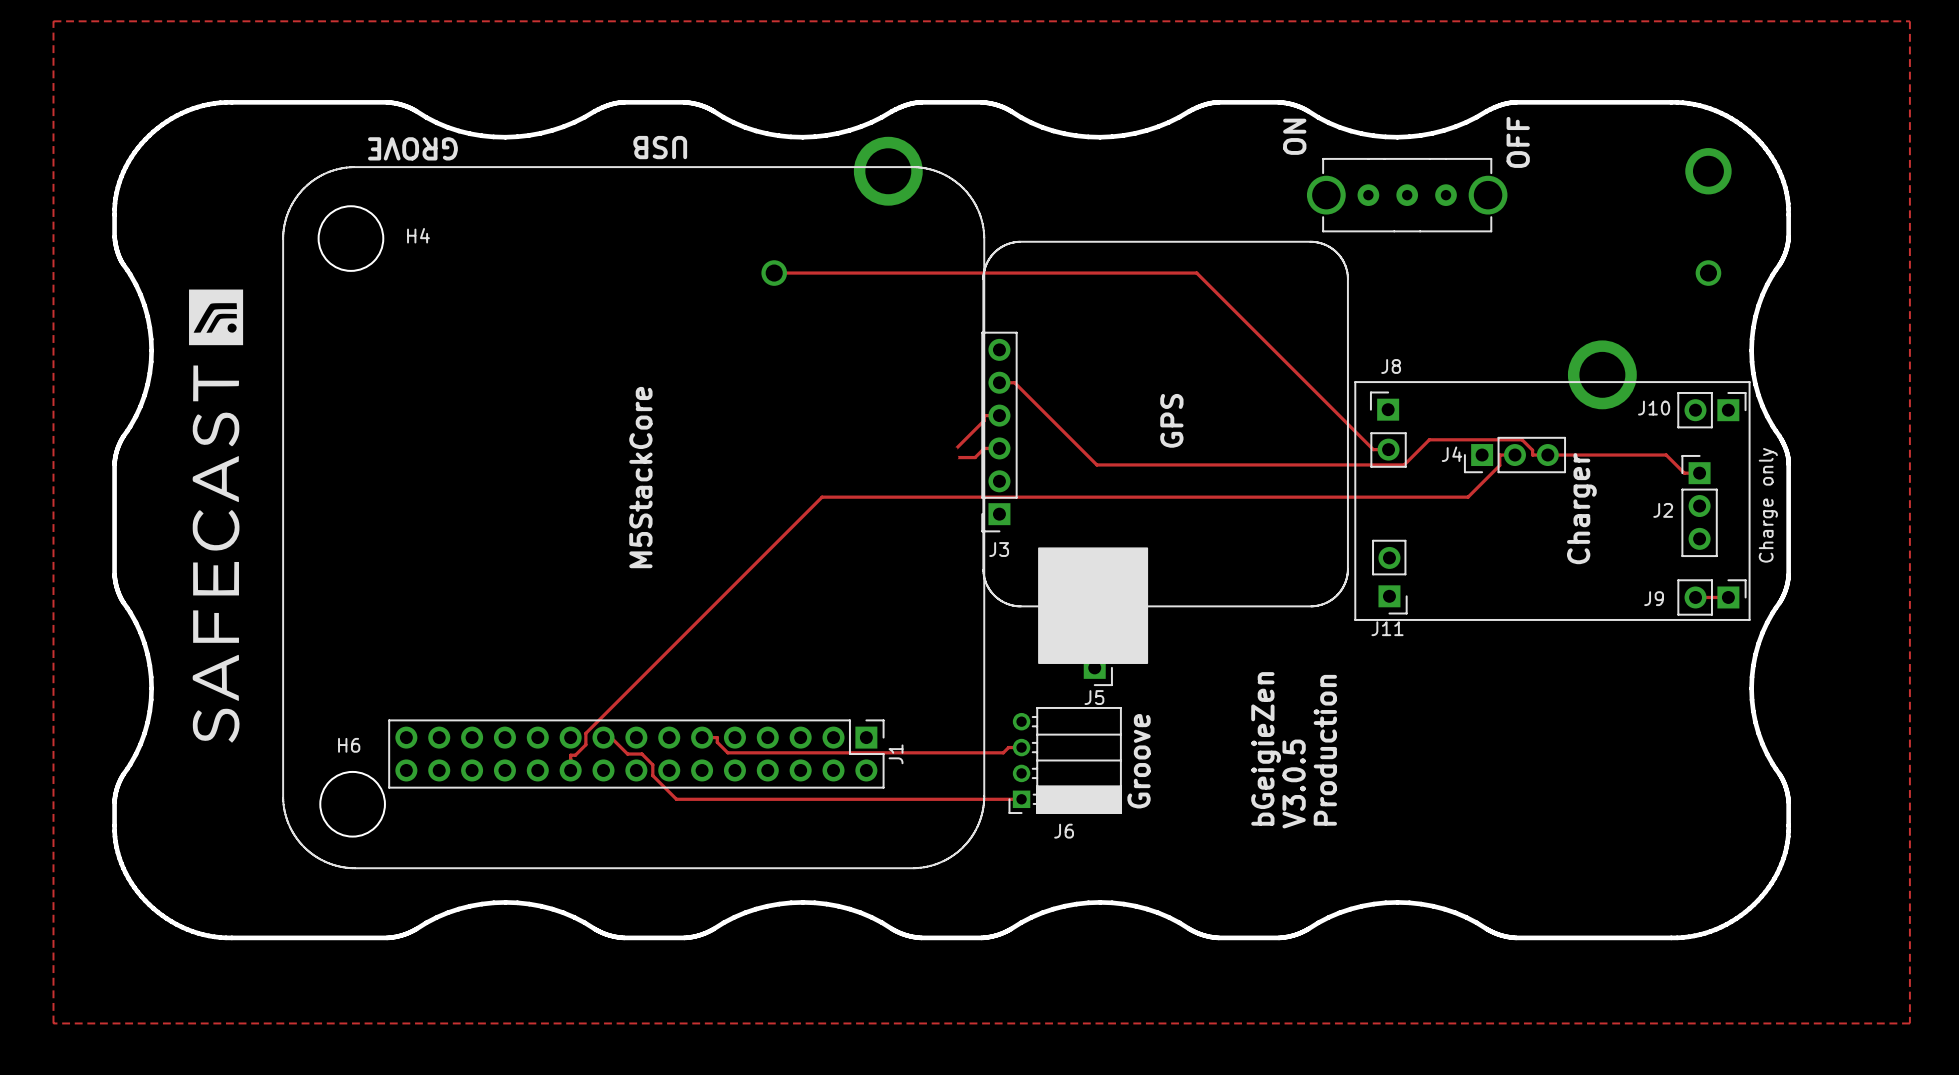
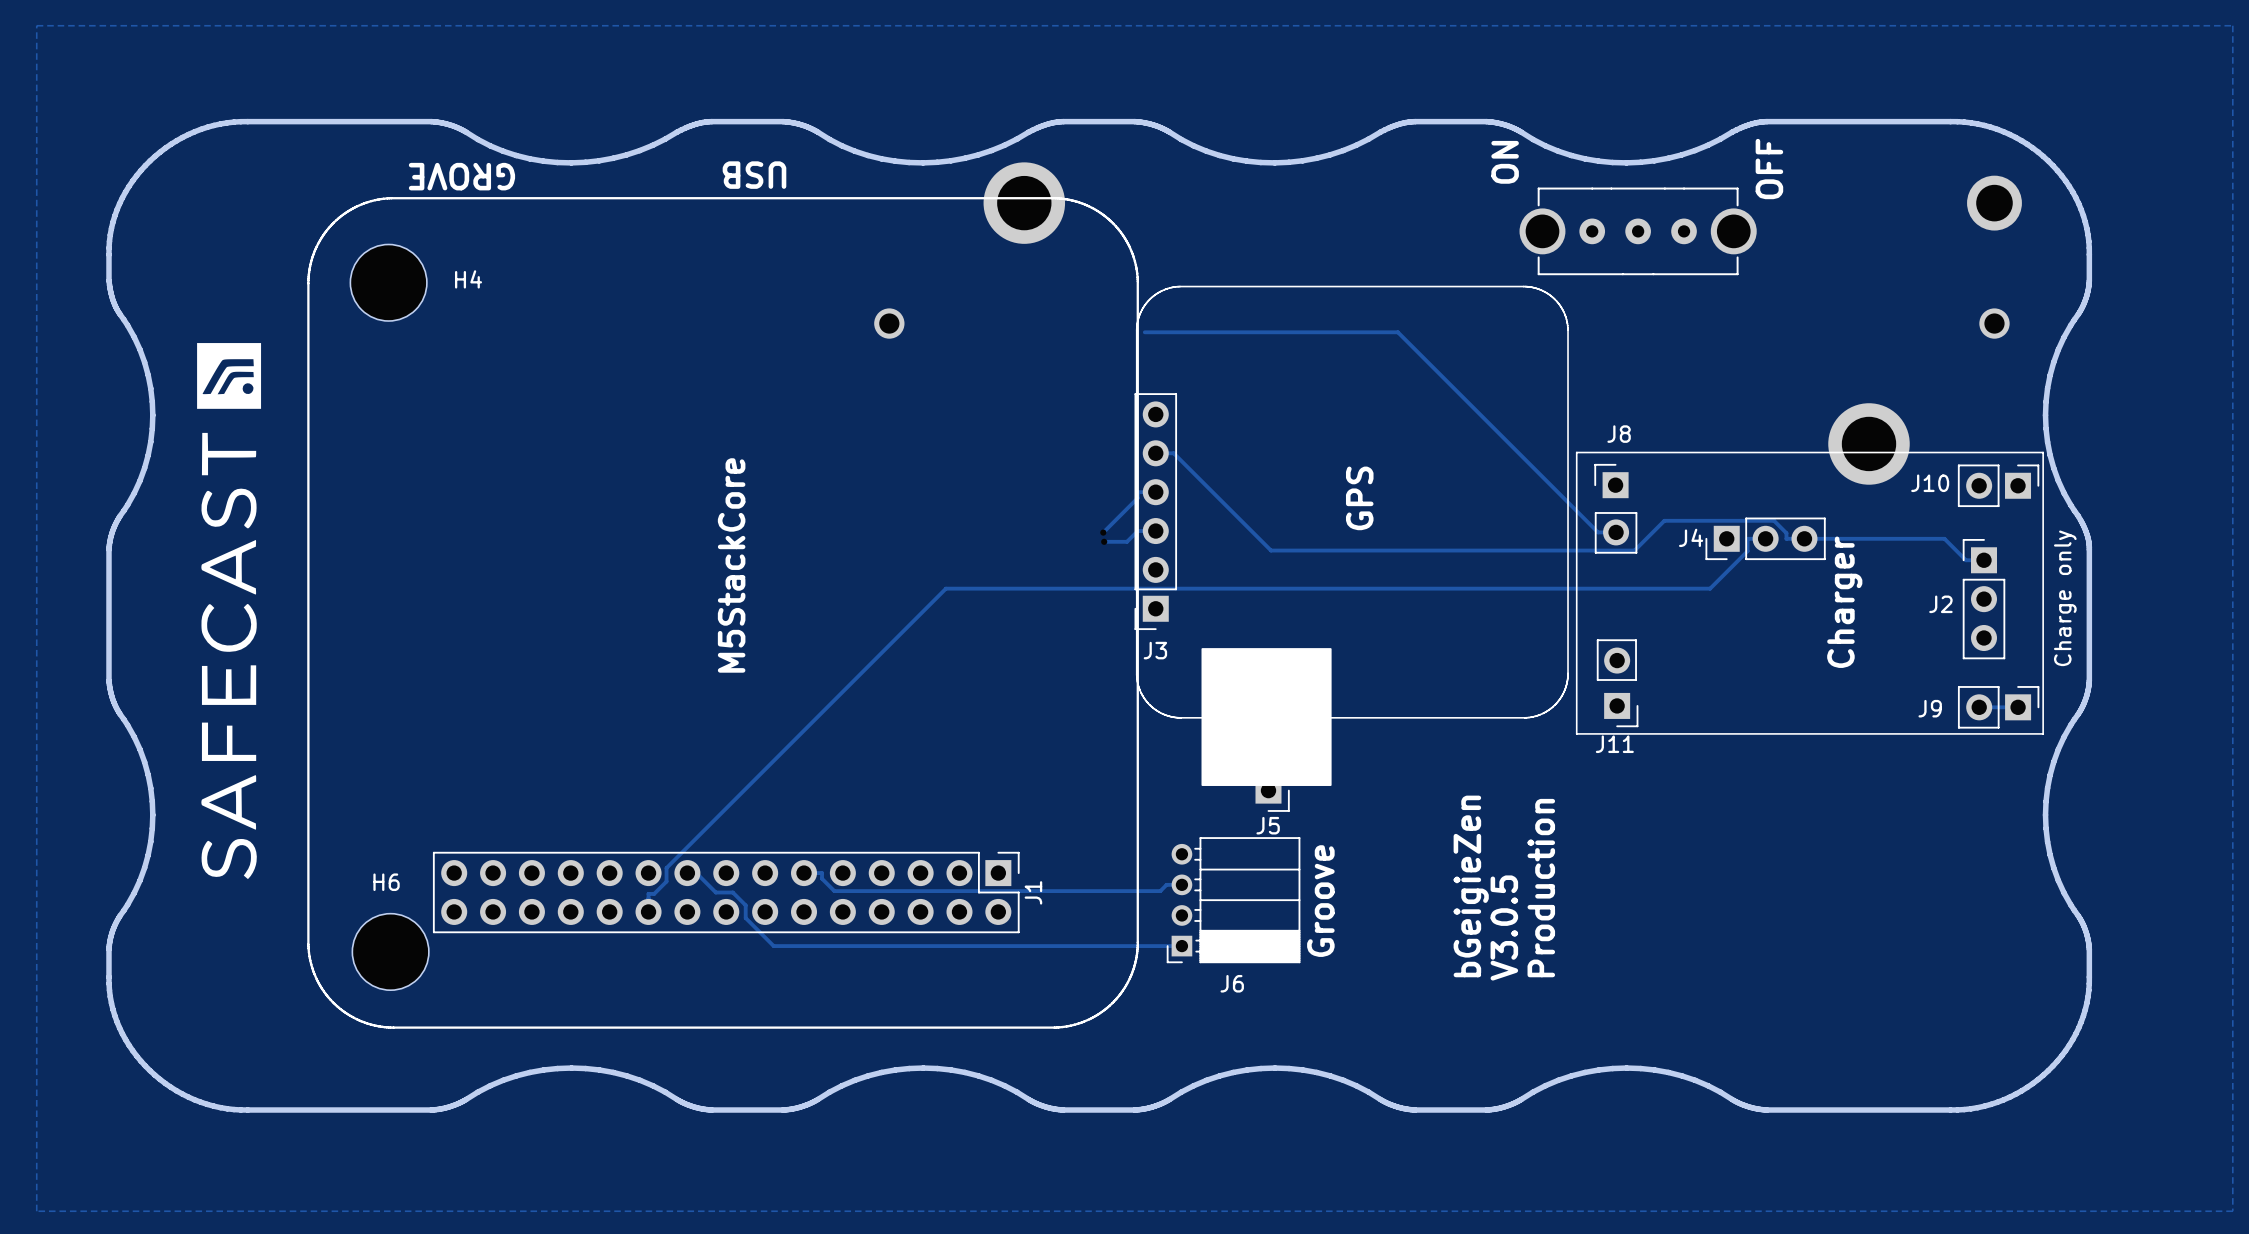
track: (774, 273) (1196, 273) (1204, 280) -> (1144, 332) (1397, 332)

